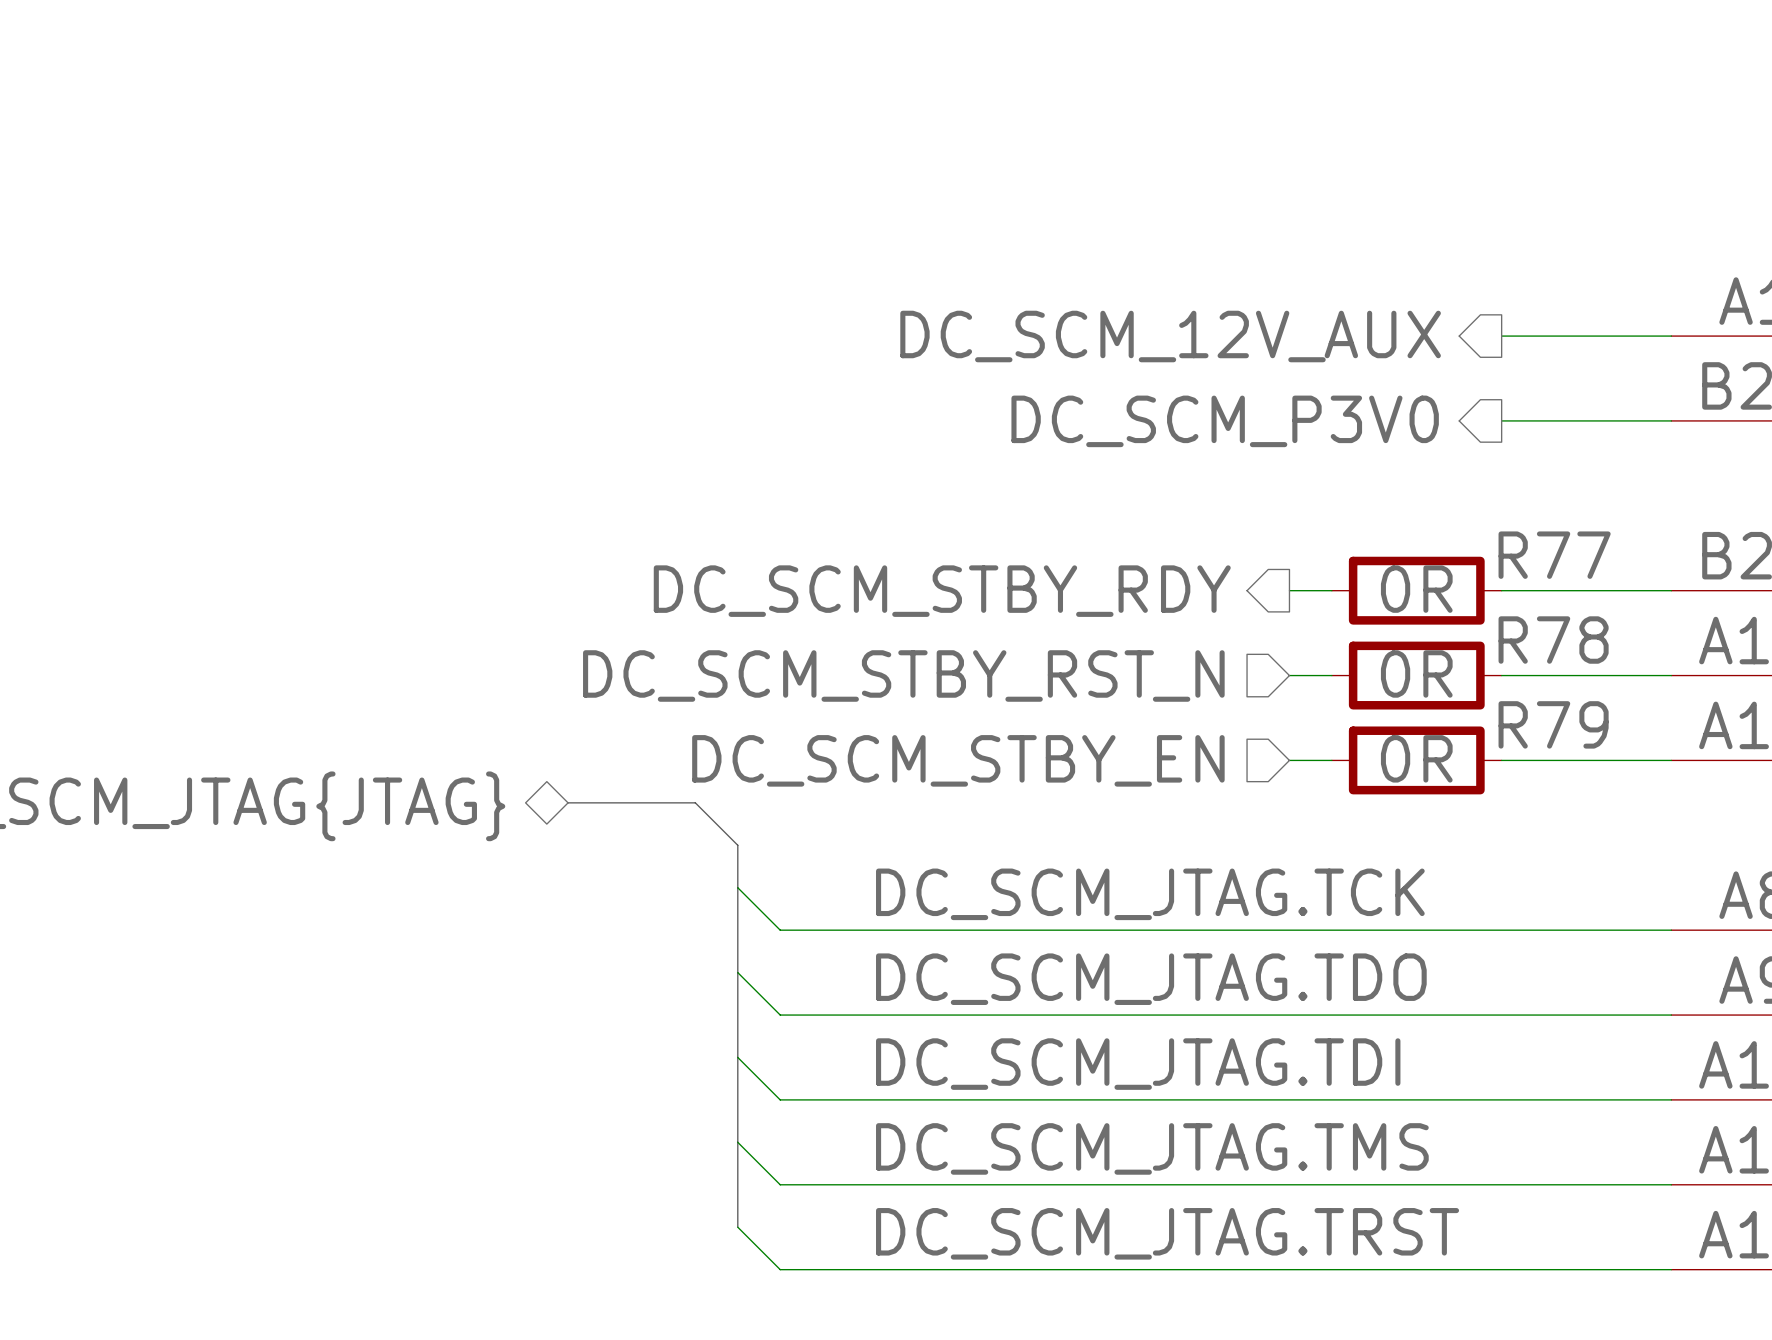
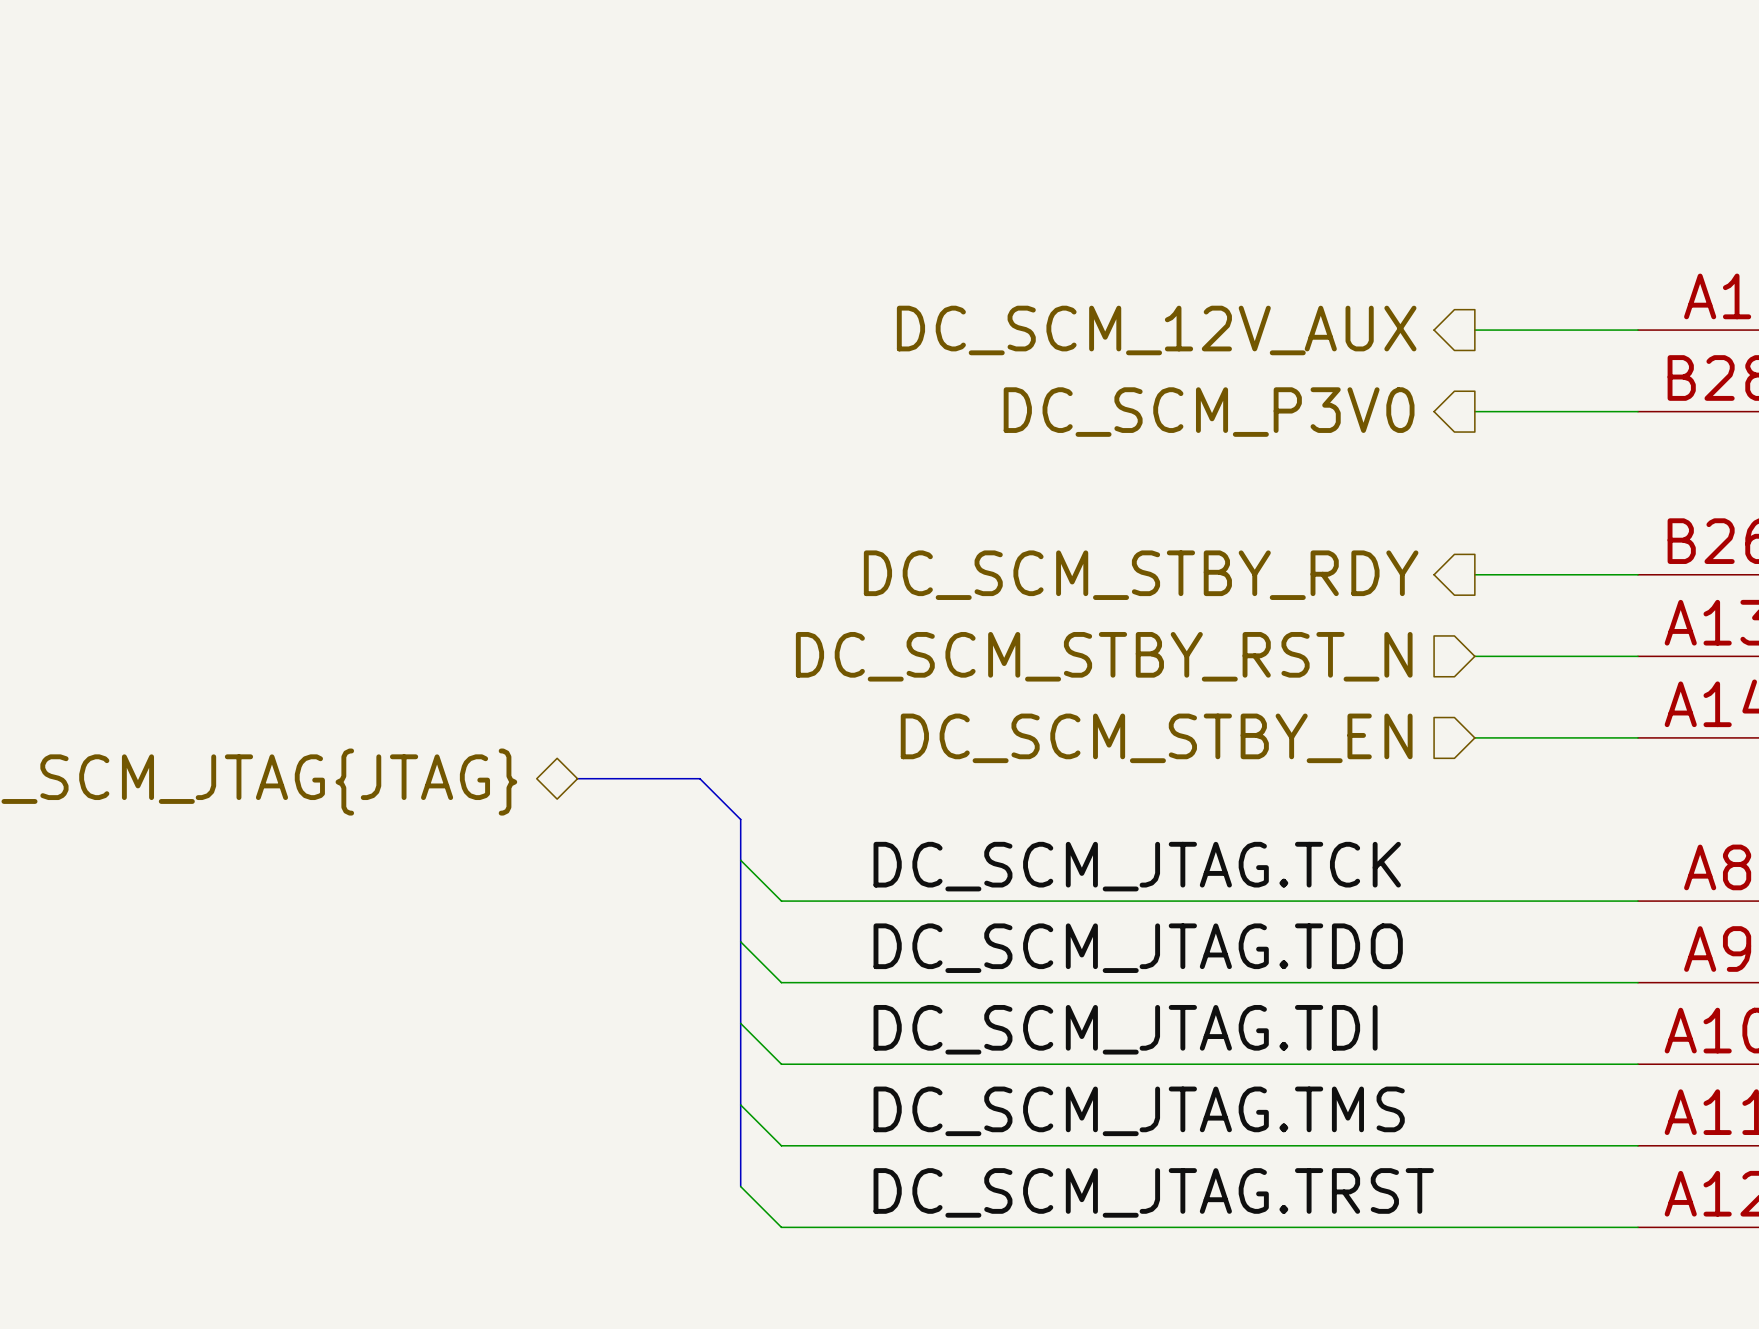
wire: (1289, 590) (1331, 590) -> none
R77: (1416, 590) -> none
hierarchical label position: DC_SCM_STBY_RDY (942, 591) -> DC_SCM_STBY_RDY (1141, 575)
hierarchical label position: DC_SCM_STBY_RST_N (903, 675) -> DC_SCM_STBY_RST_N (1104, 656)
wire: (1289, 675) (1331, 675) -> none
R78: (1416, 675) -> none
hierarchical label position: DC_SCM_STBY_EN (958, 760) -> DC_SCM_STBY_EN (1156, 738)
wire: (1289, 760) (1331, 760) -> none
R79: (1416, 760) -> none

